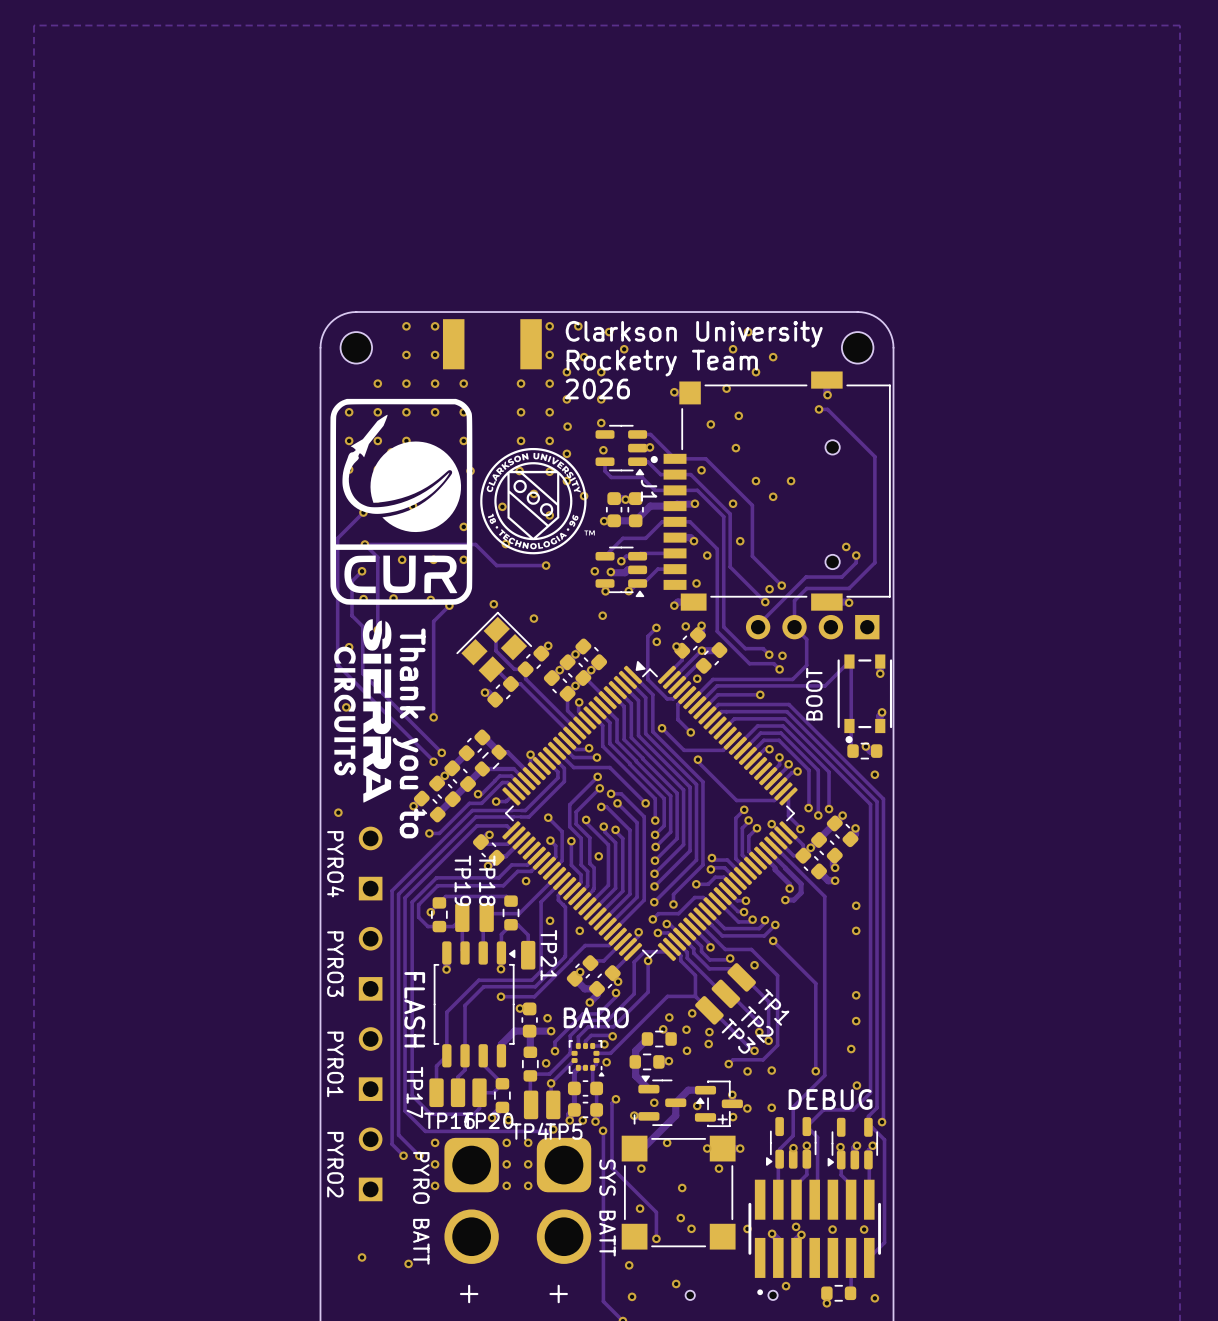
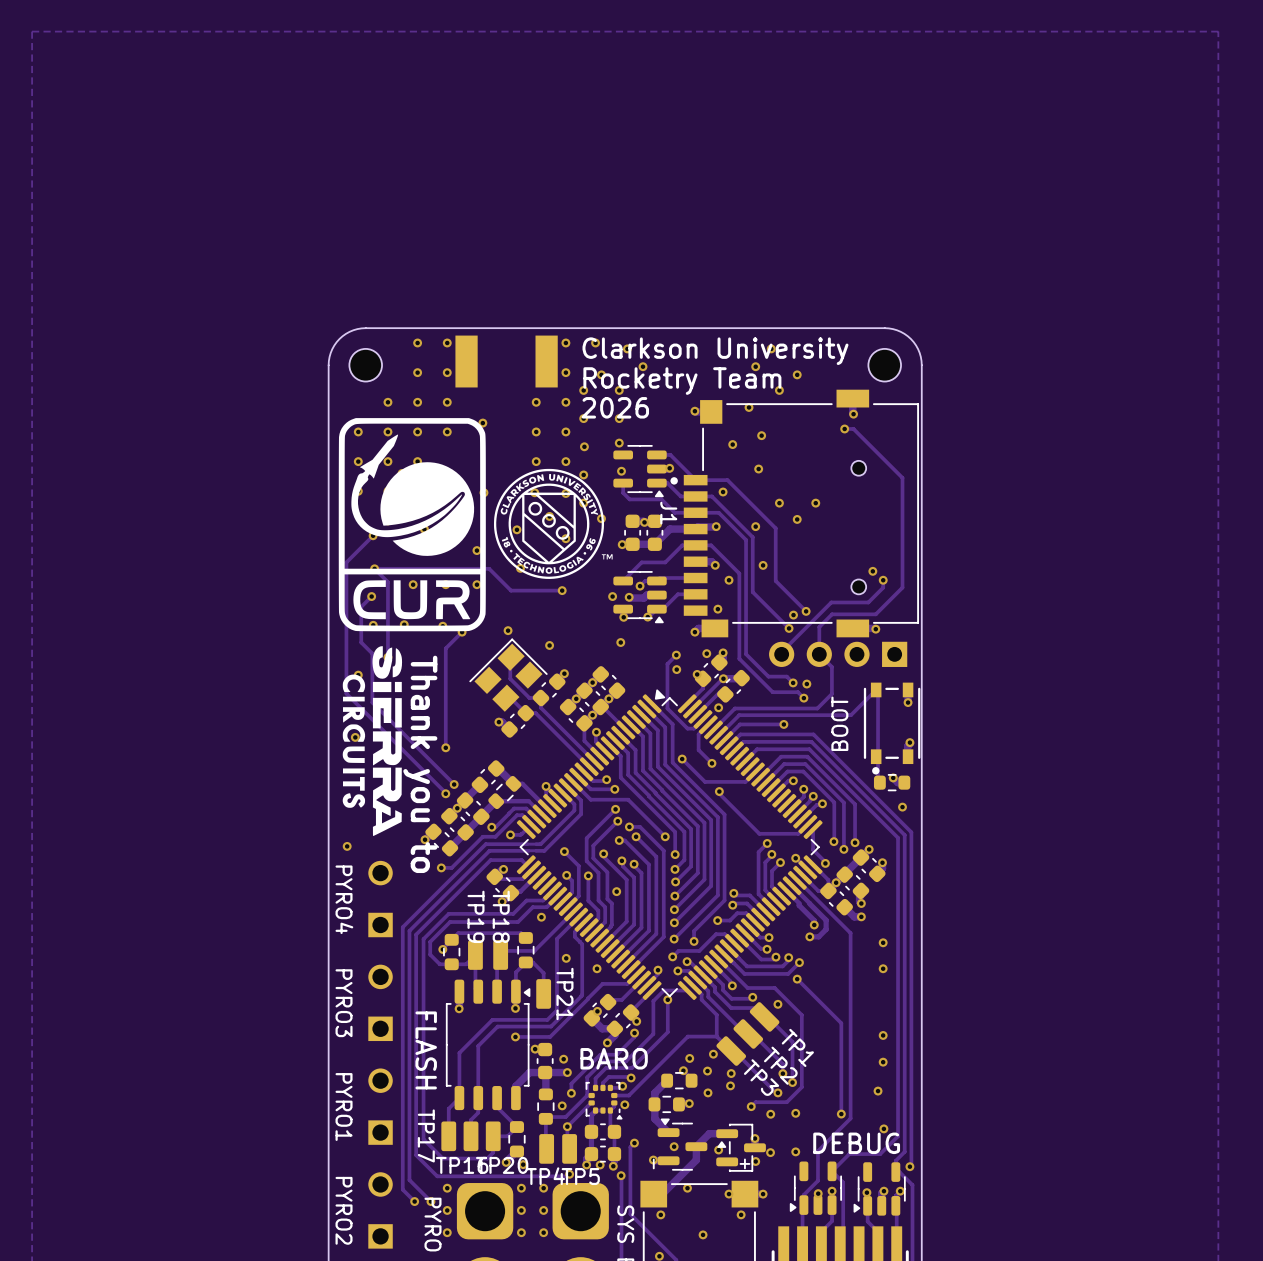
via: (463, 383) -> none
via: none -> (482, 423)
via: (463, 412) -> none
via: (463, 440) -> none

